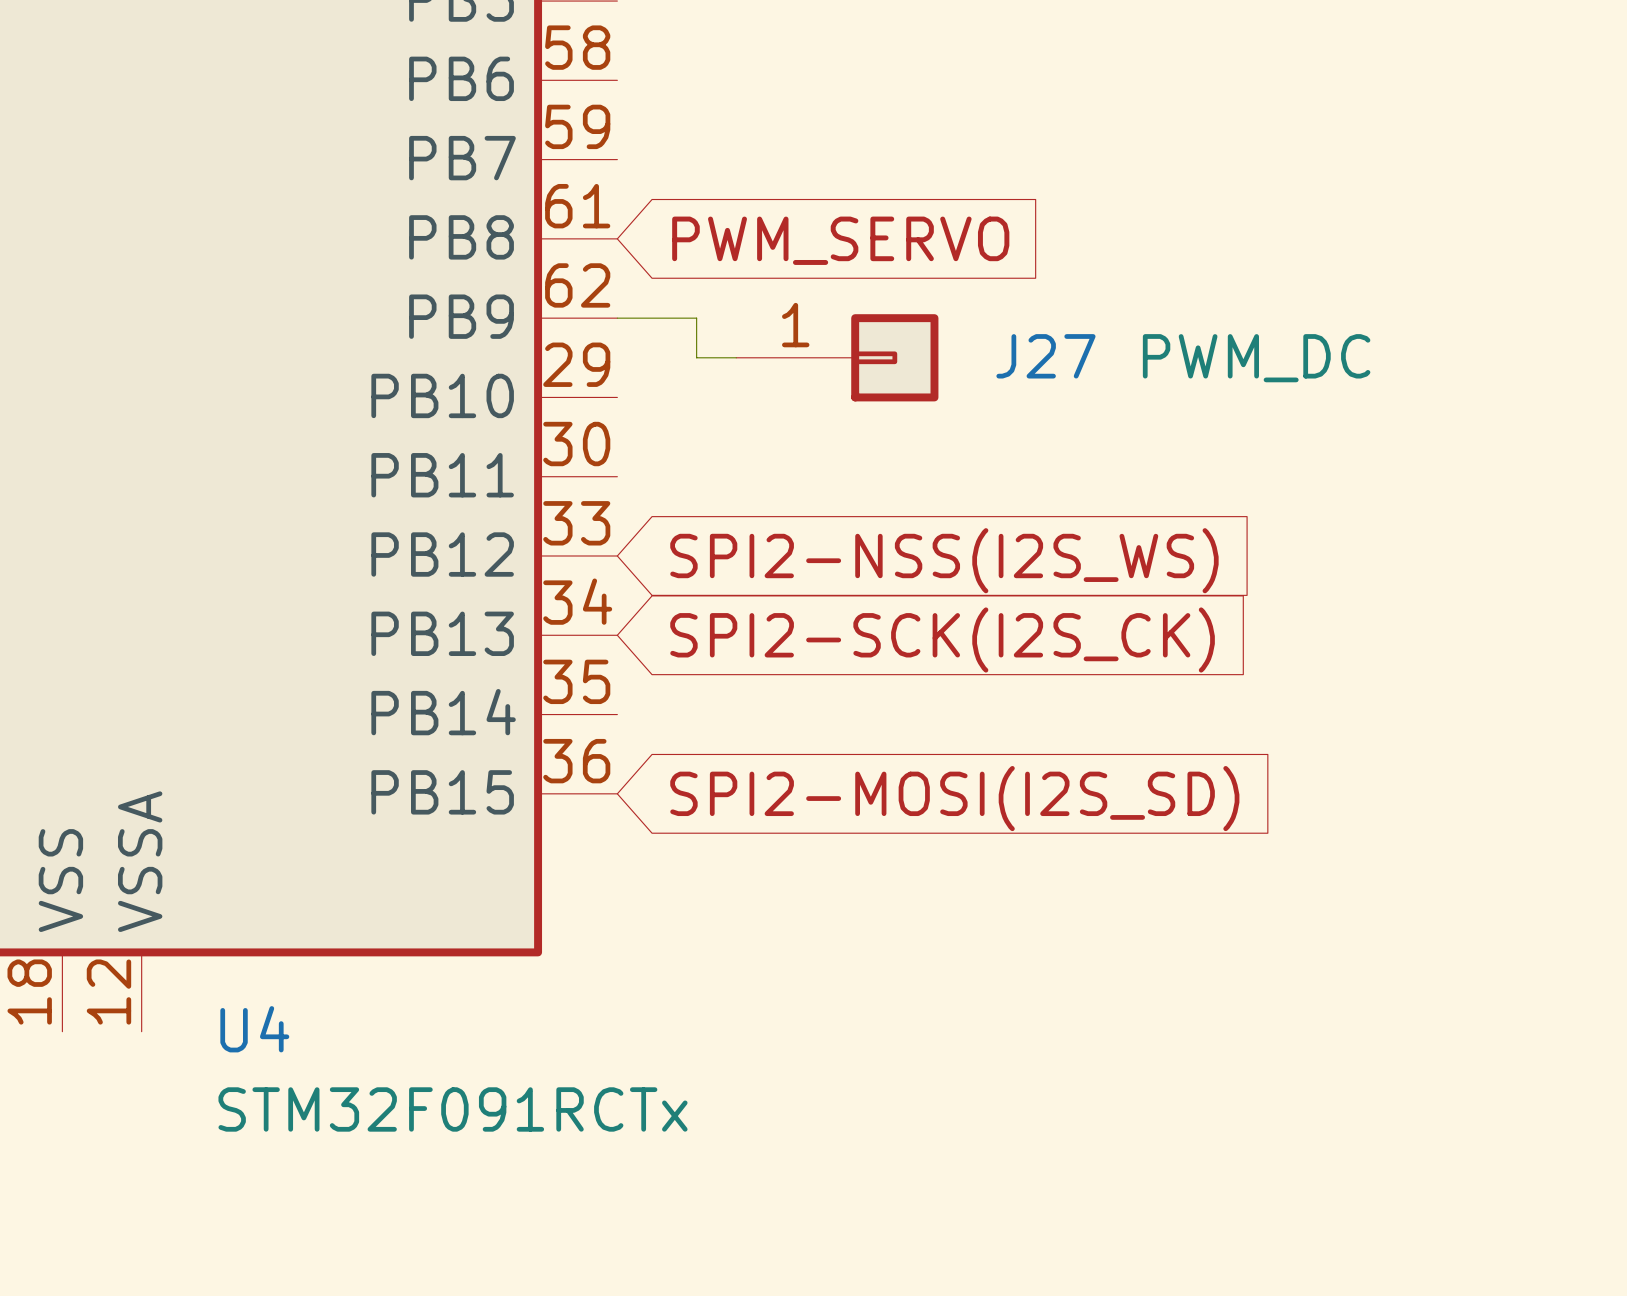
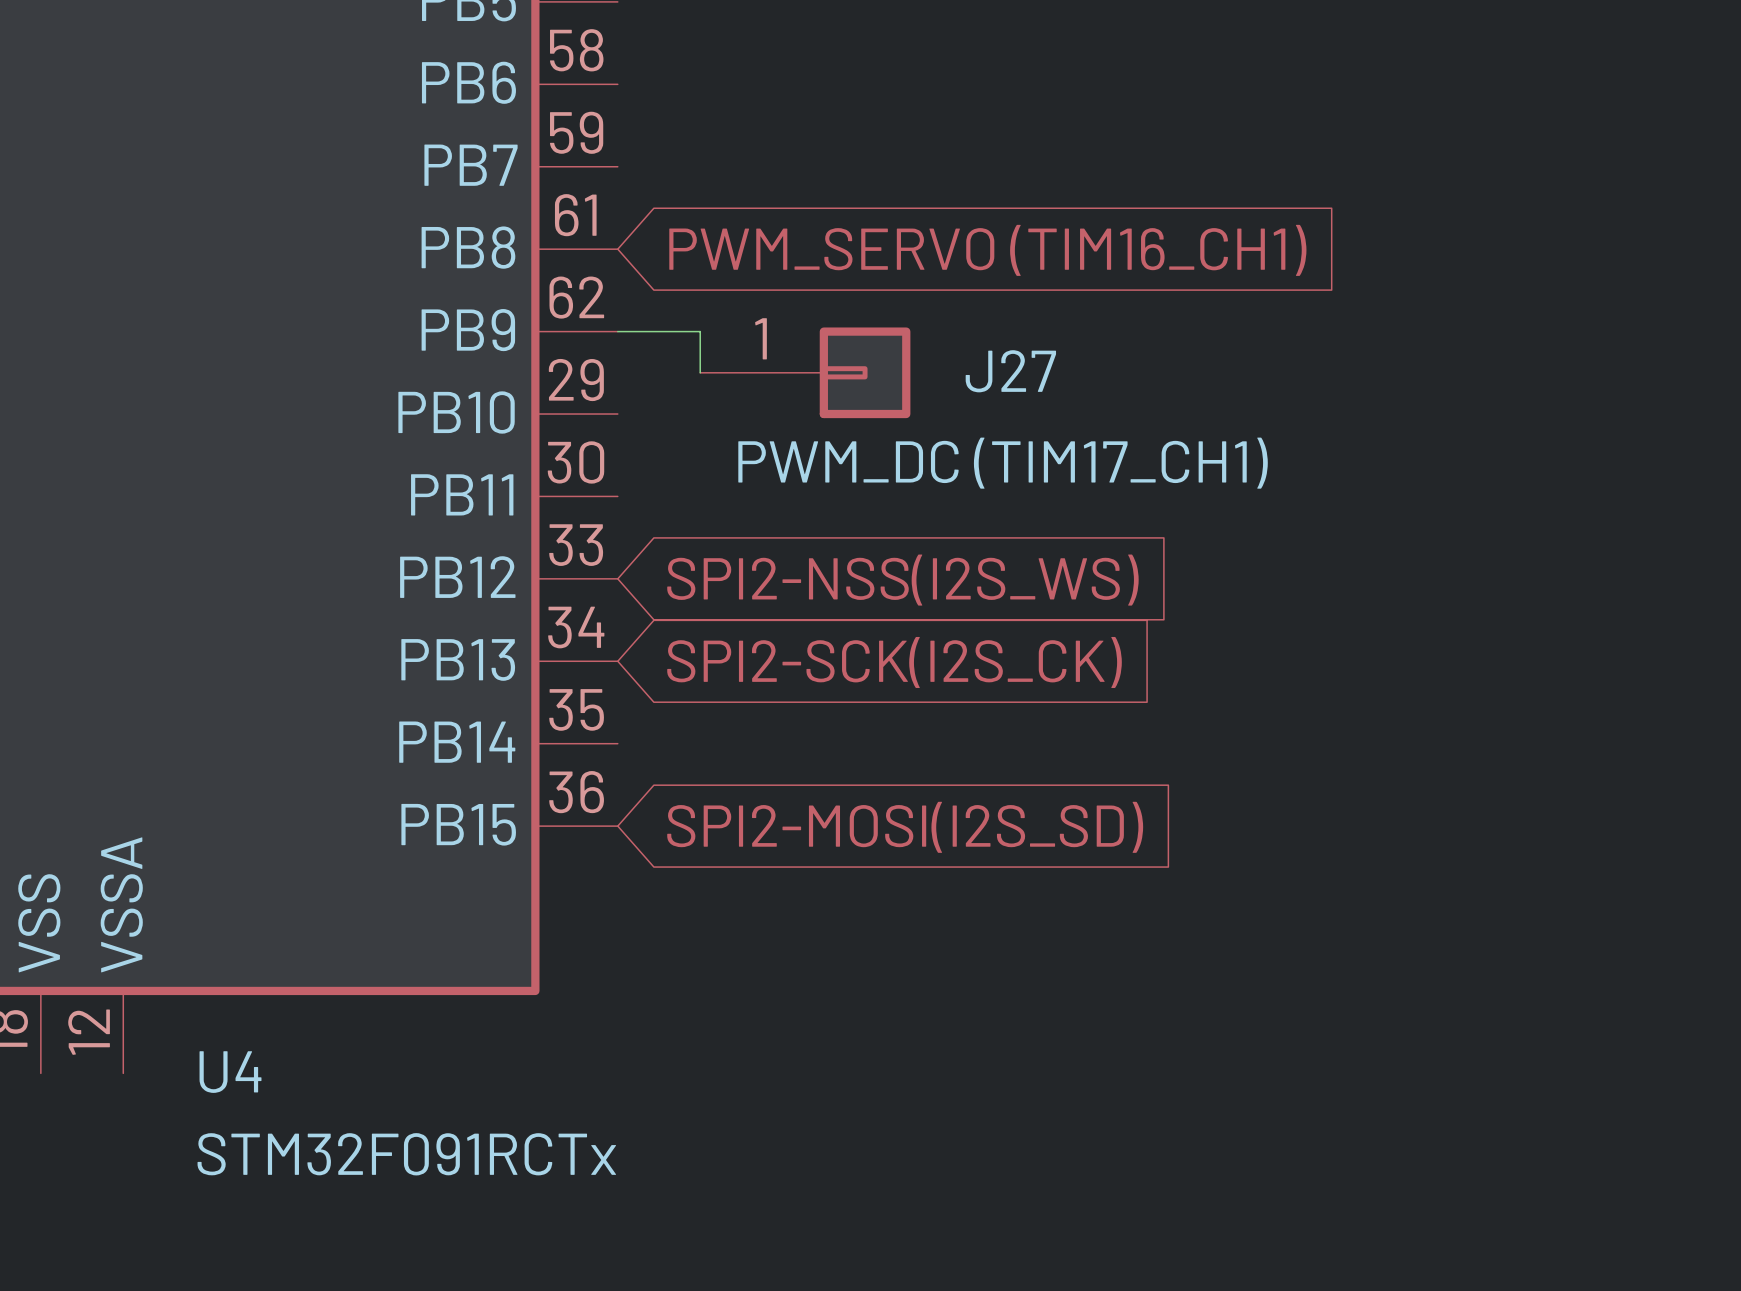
global label: PWM_SERVO (840, 240) -> PWM_SERVO (TIM16_CH1) (987, 250)
J27 position: (837, 357) -> (805, 372)
J27 value: PWM_DC (1256, 358) -> PWM_DC (TIM17_CH1) (1003, 463)

